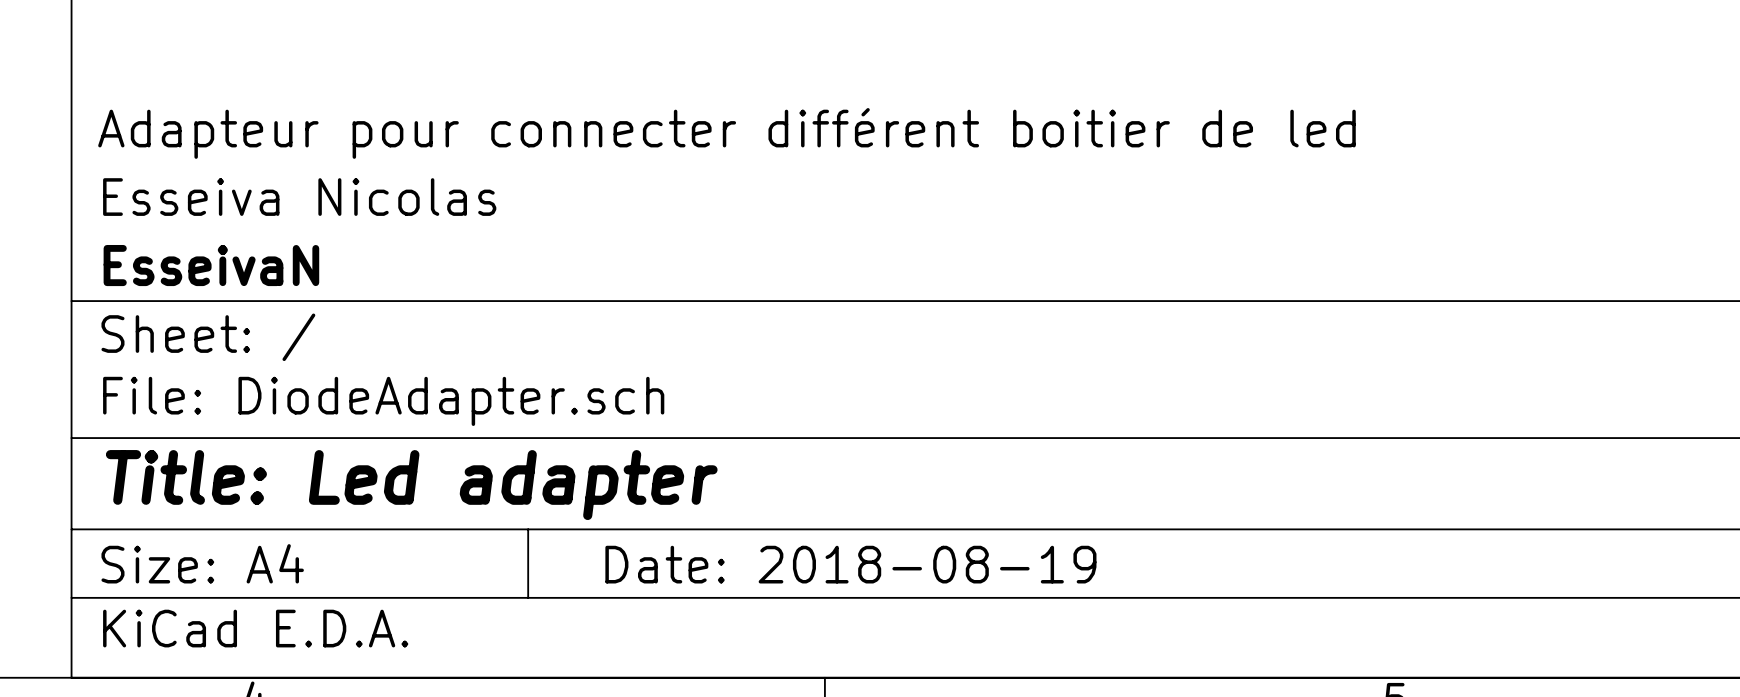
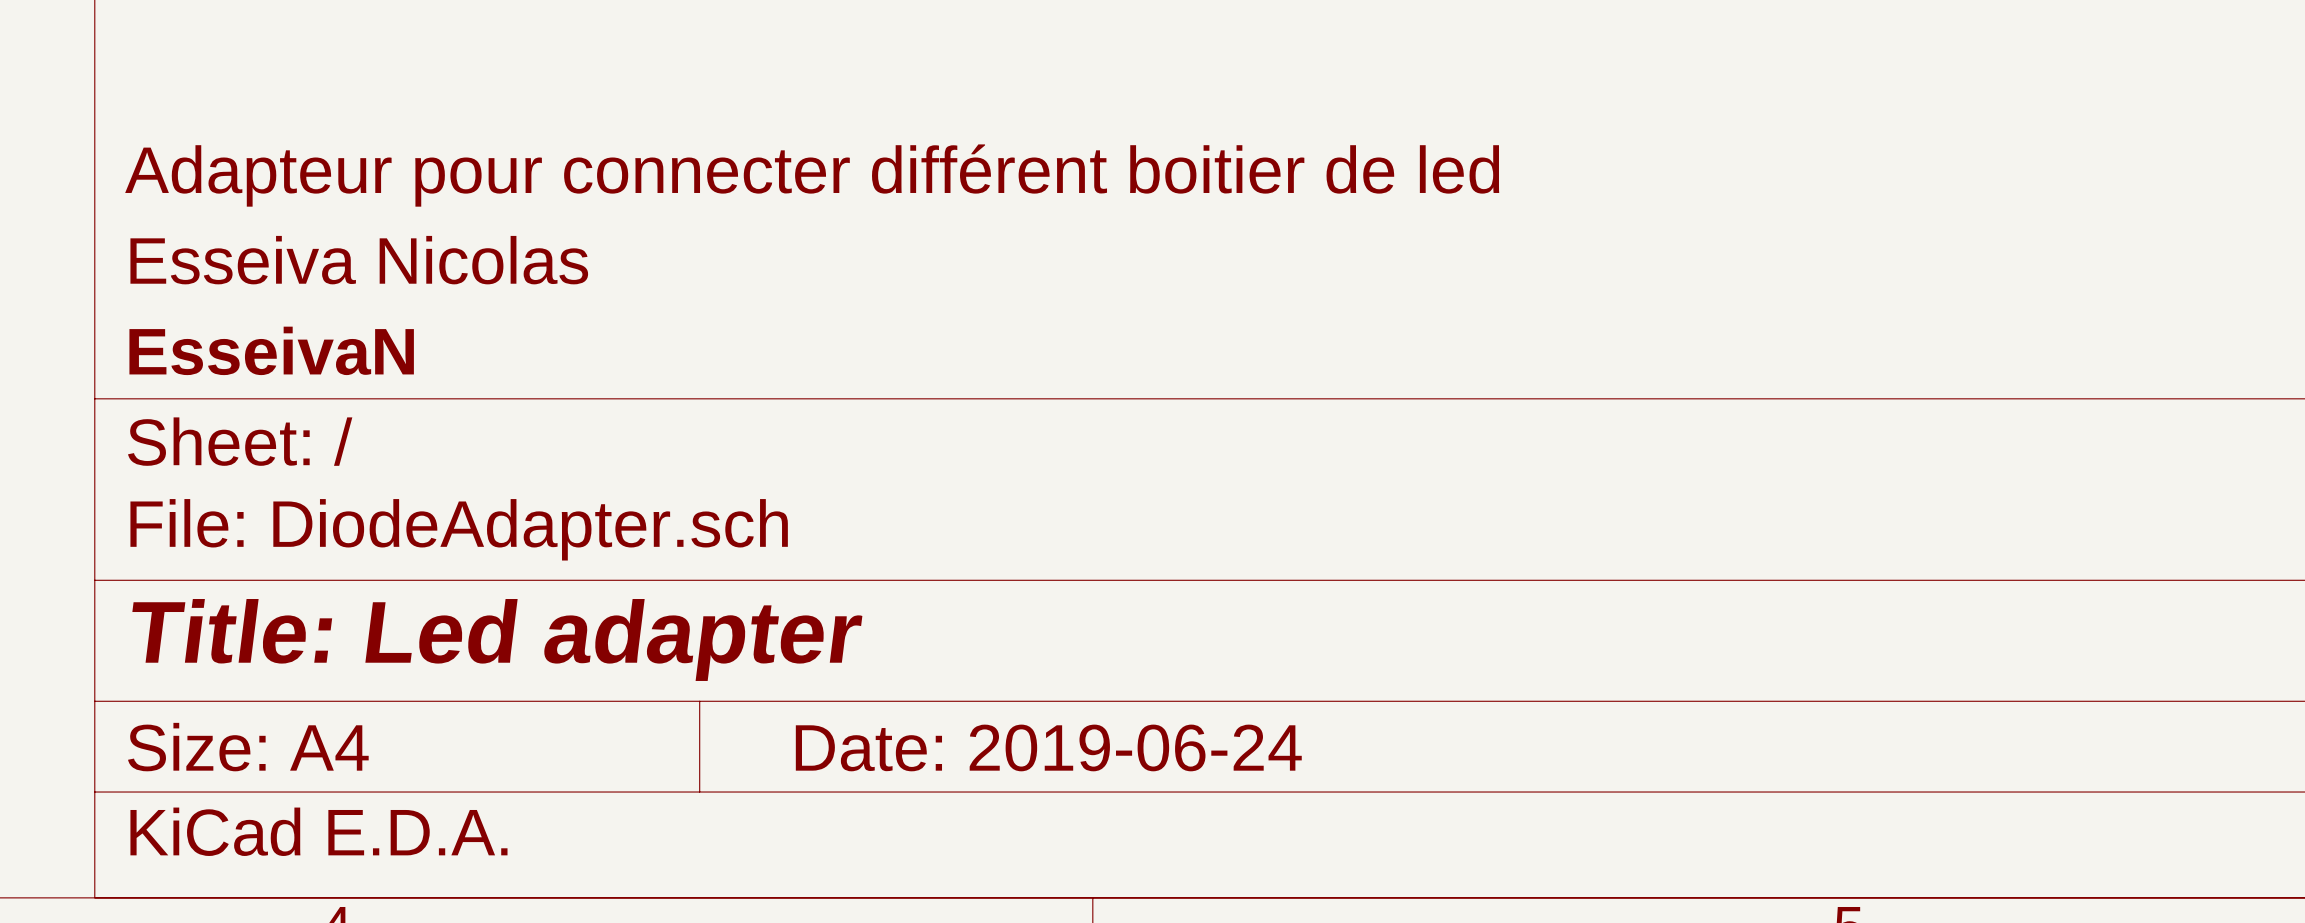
title block: Date: 2018-08-19 (850, 564) -> Date: 2019-06-24 (1048, 747)

